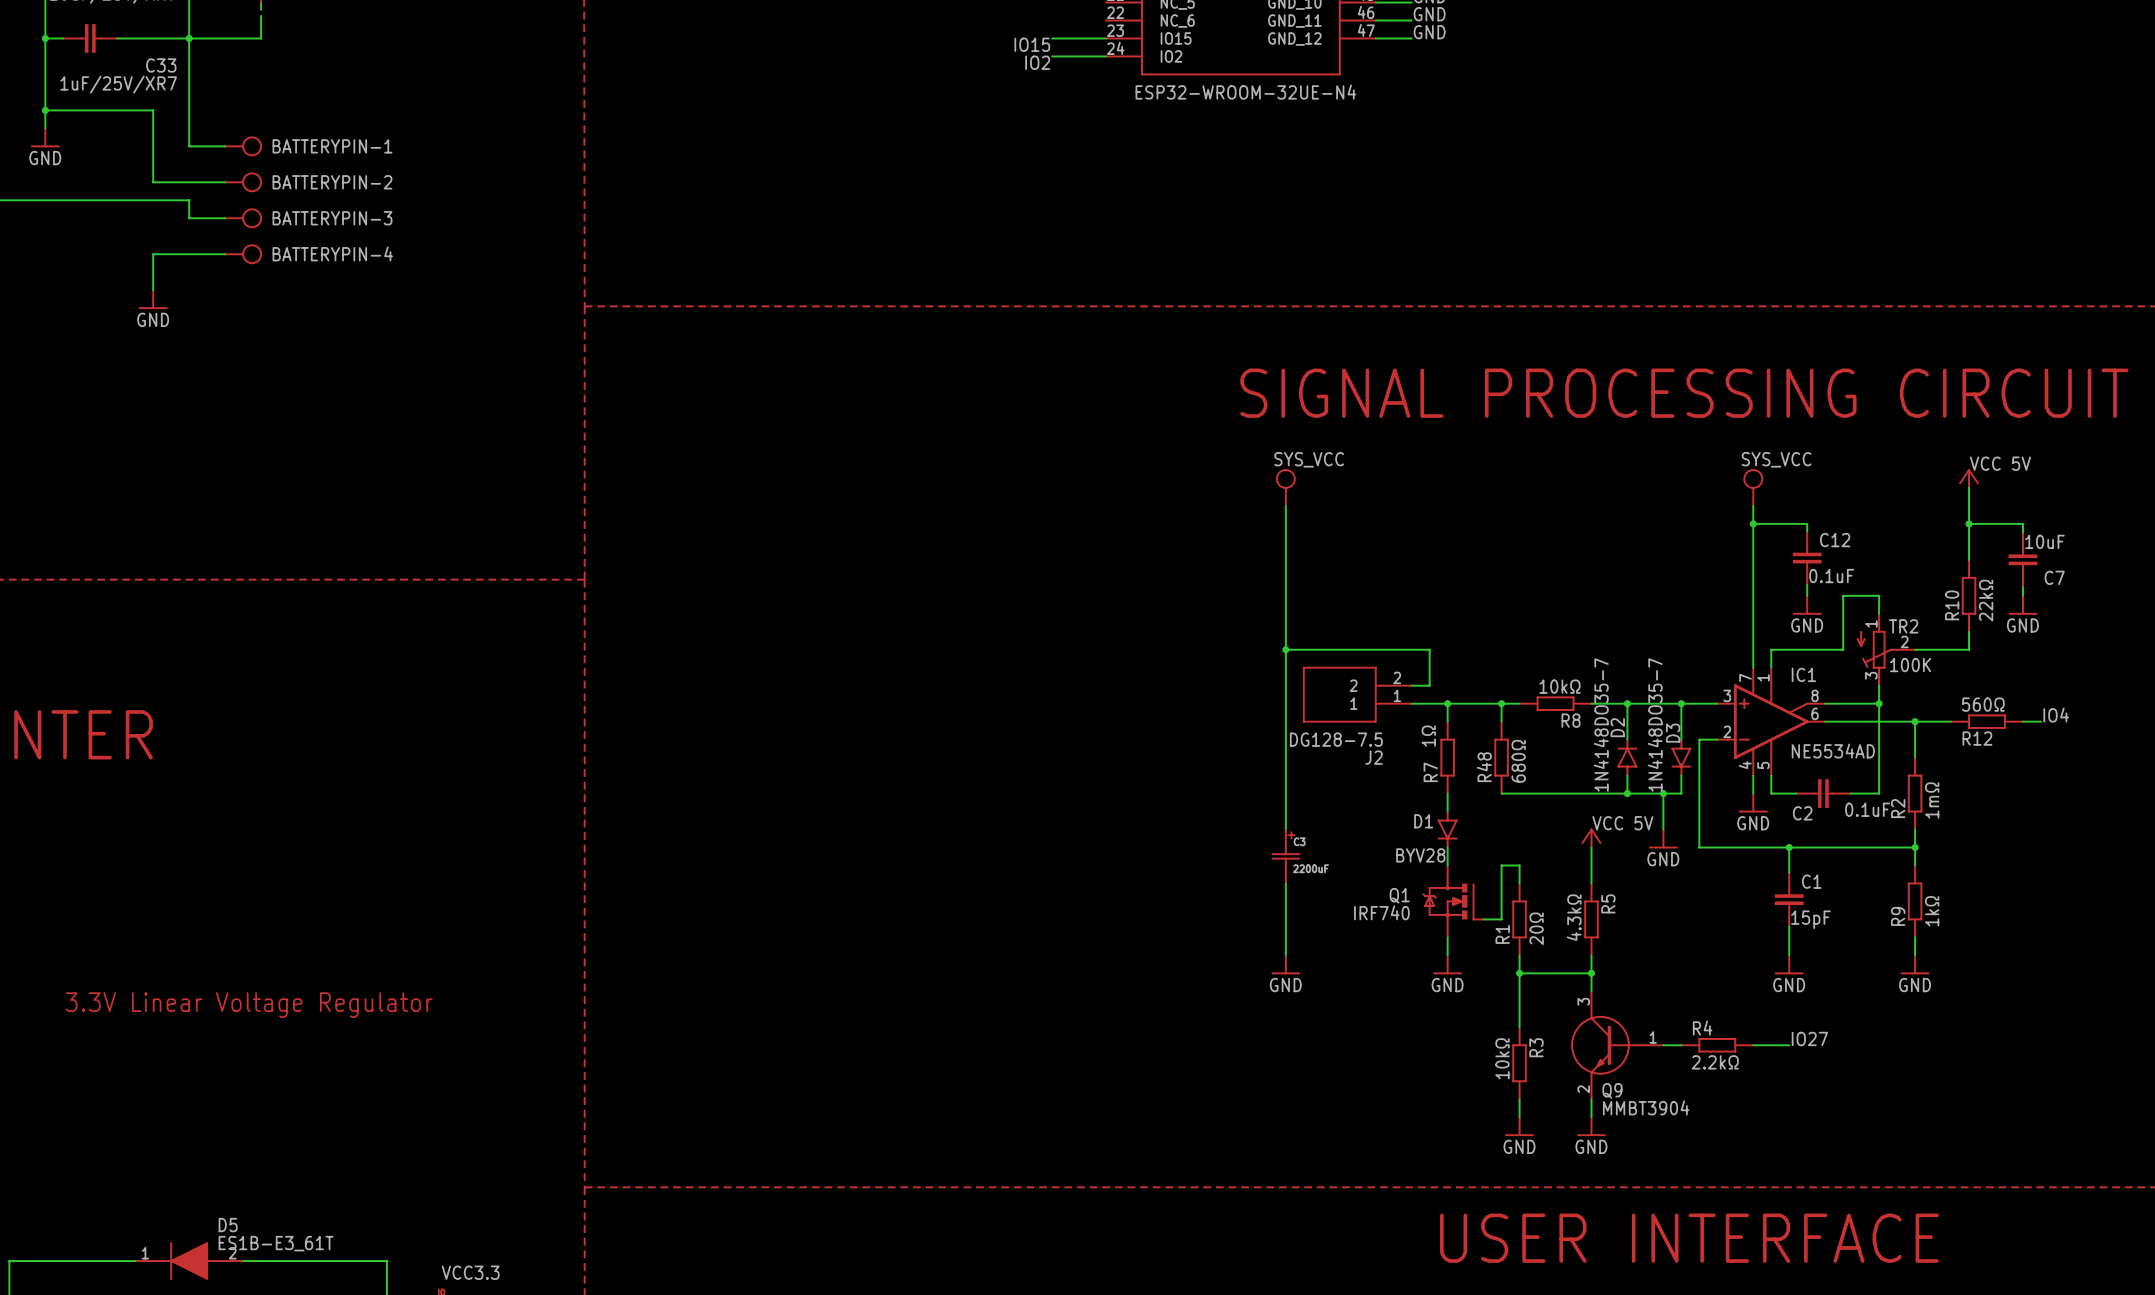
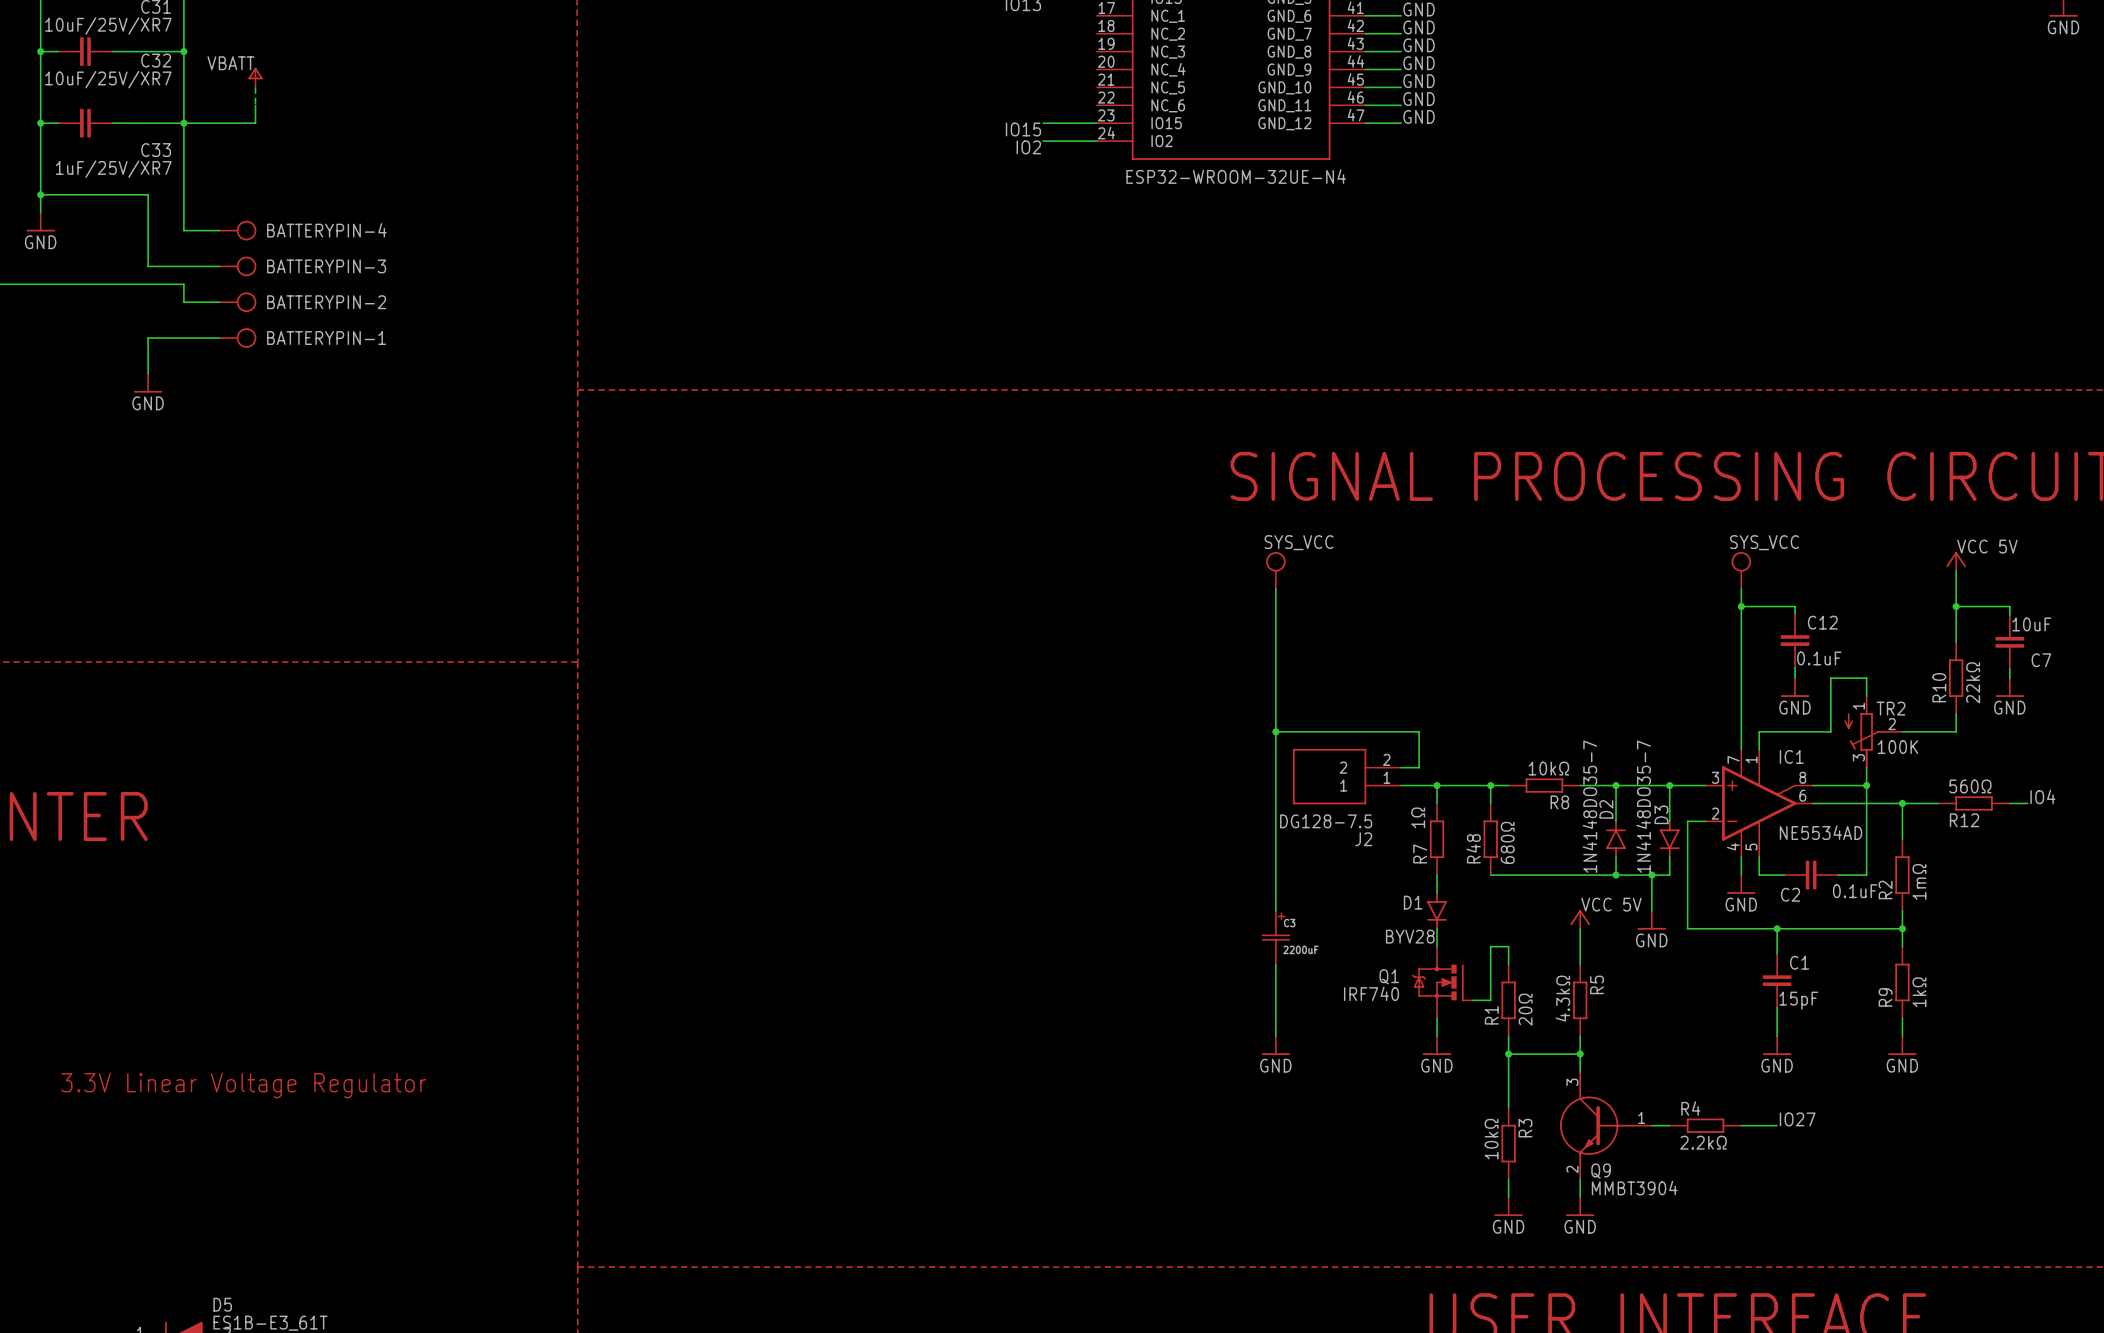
BATTERYPIN-1 name: BATTERYPIN-1 (332, 146) -> BATTERYPIN-4 (326, 230)
BATTERYPIN-2 name: BATTERYPIN-2 (332, 182) -> BATTERYPIN-3 (326, 266)
BATTERYPIN-3 name: BATTERYPIN-3 (332, 218) -> BATTERYPIN-2 (326, 302)
BATTERYPIN-4 name: BATTERYPIN-4 (332, 253) -> BATTERYPIN-1 (326, 338)

